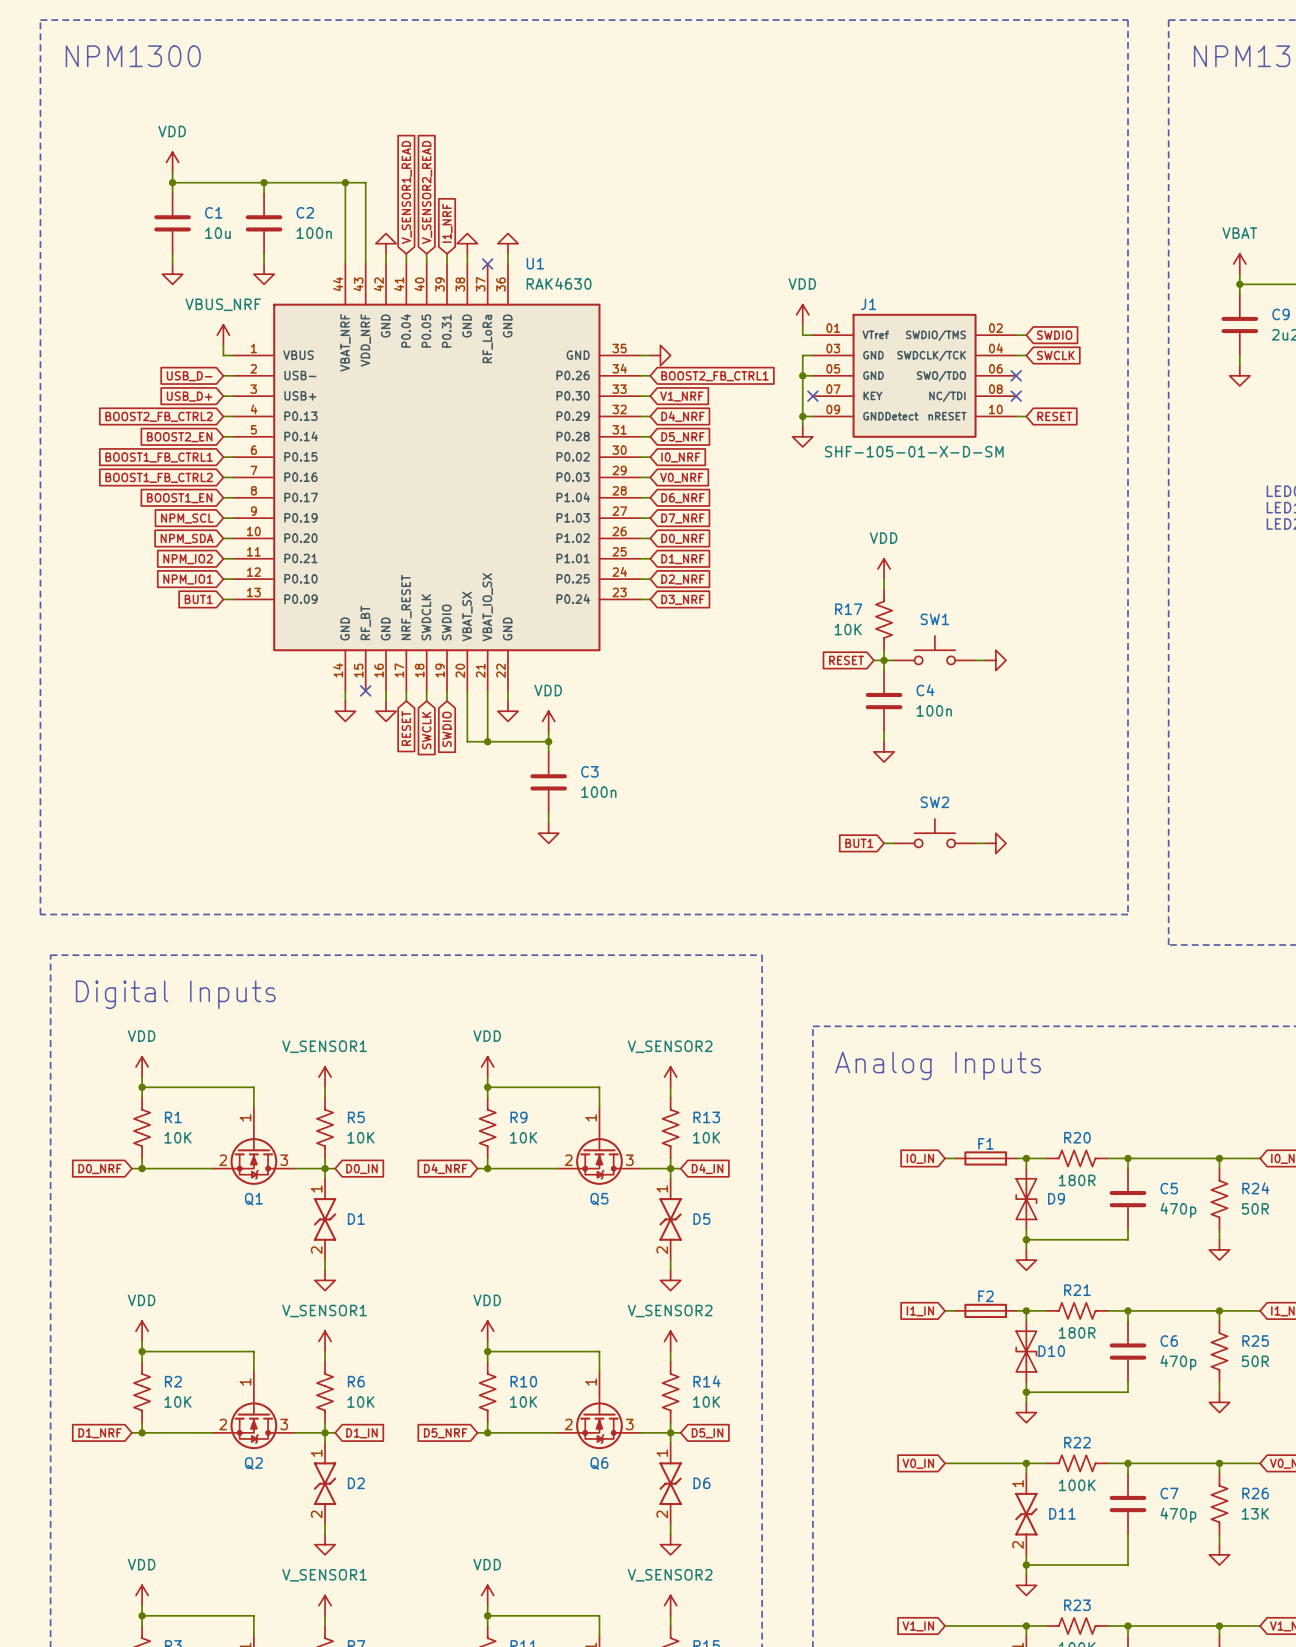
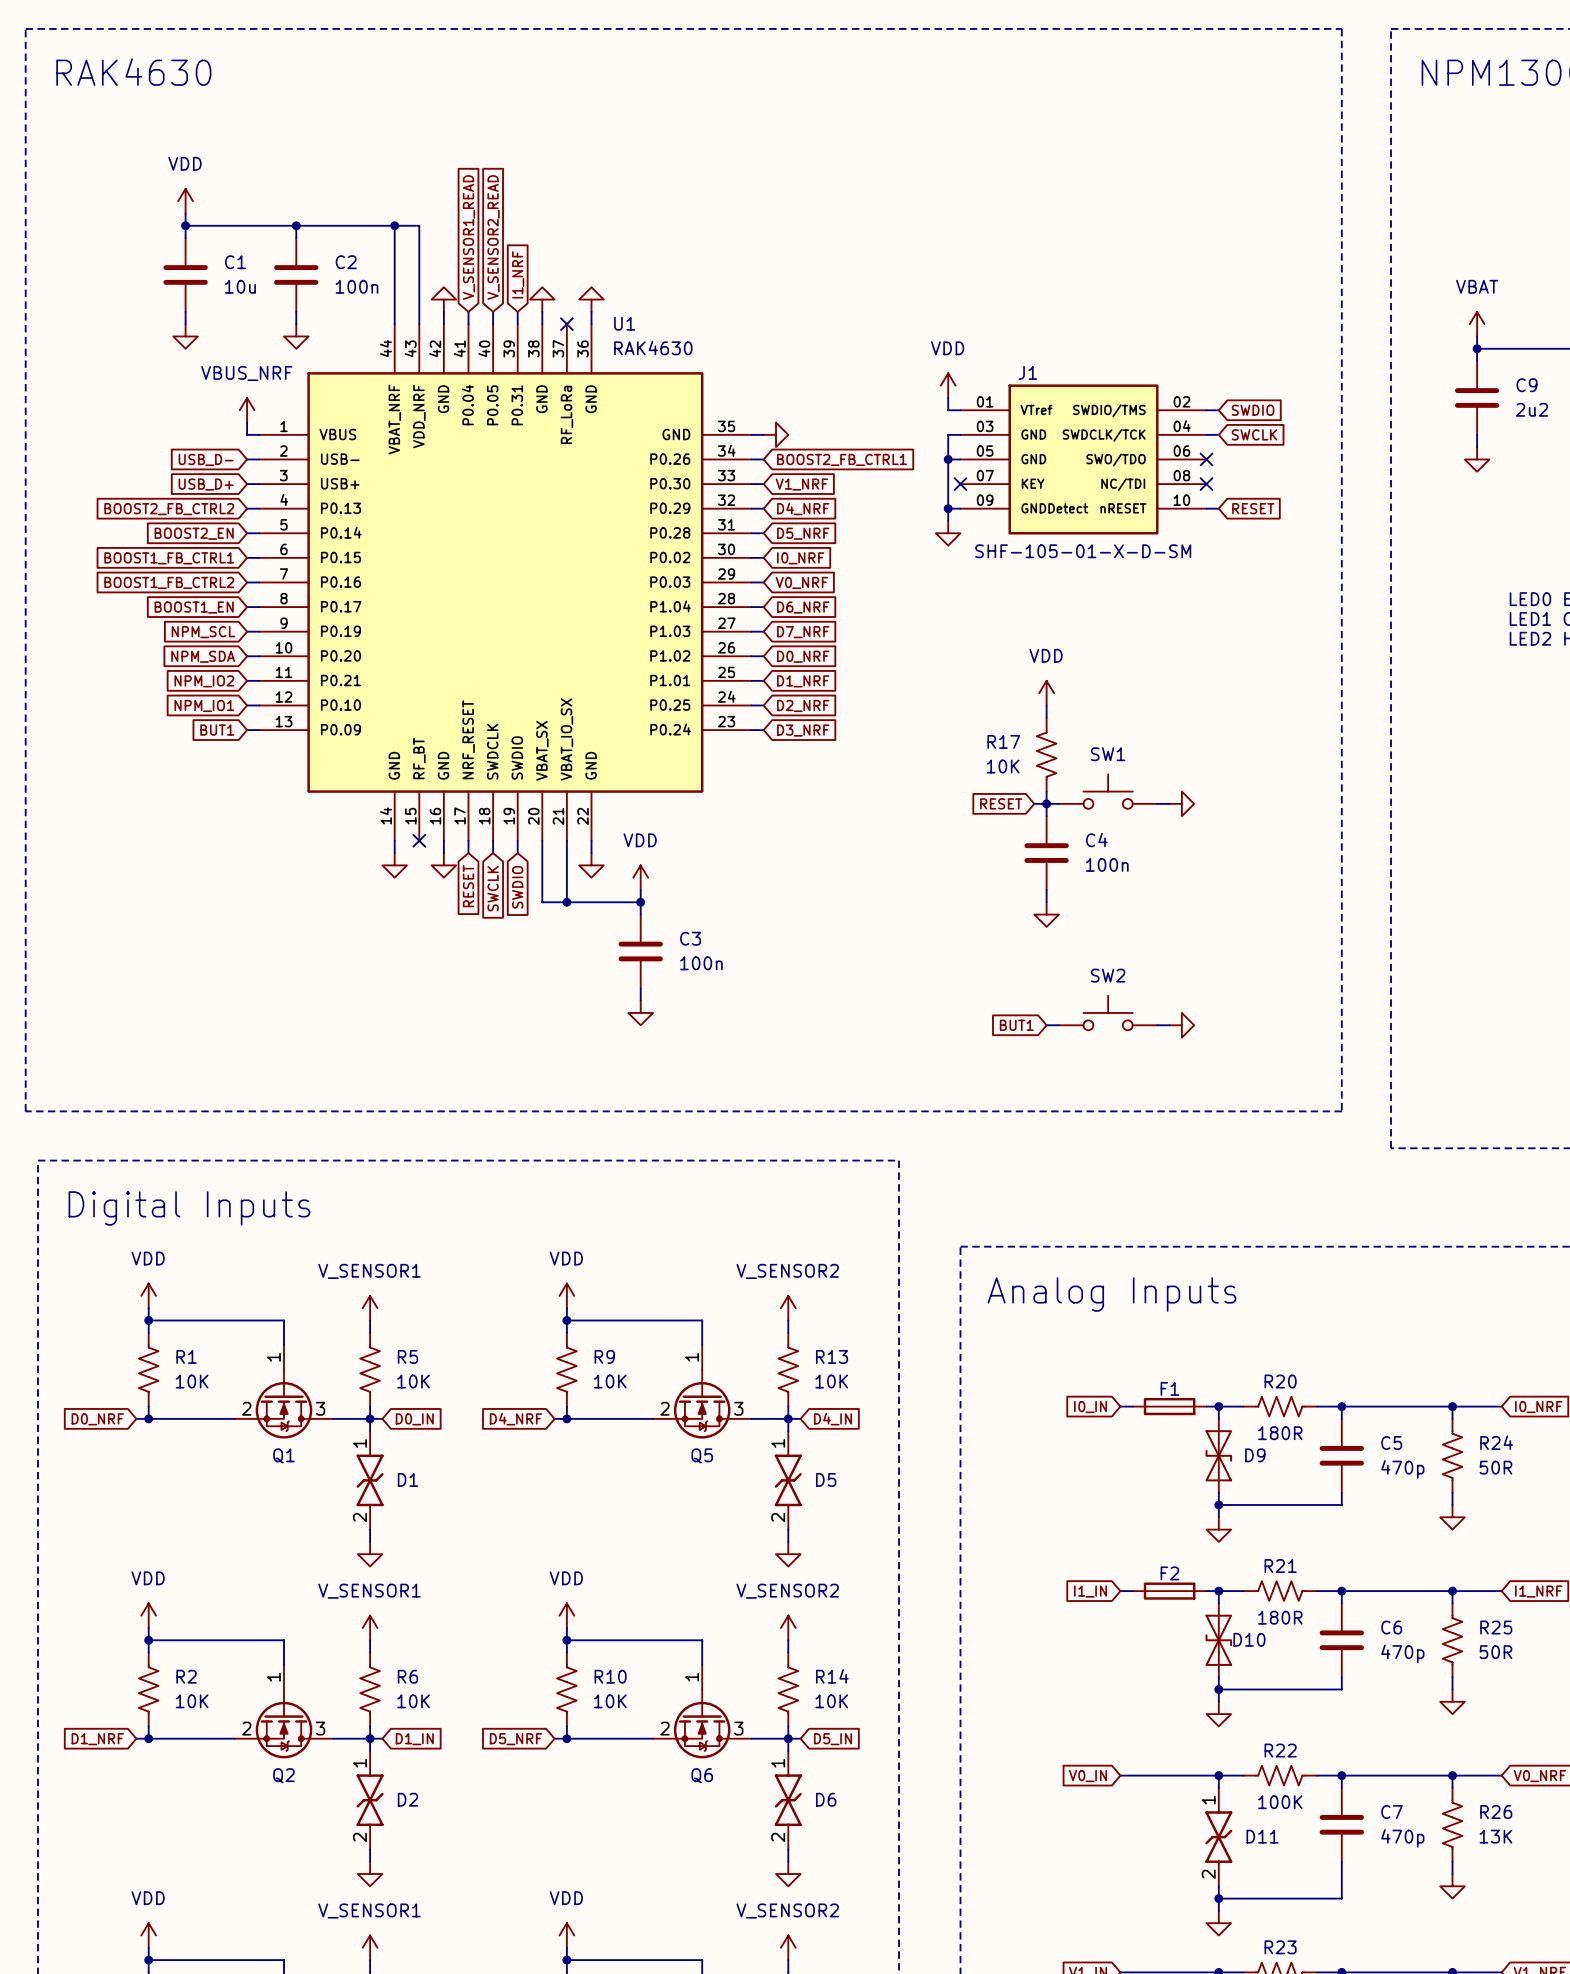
text: NPM1300 (133, 56) -> RAK4630 (133, 72)

